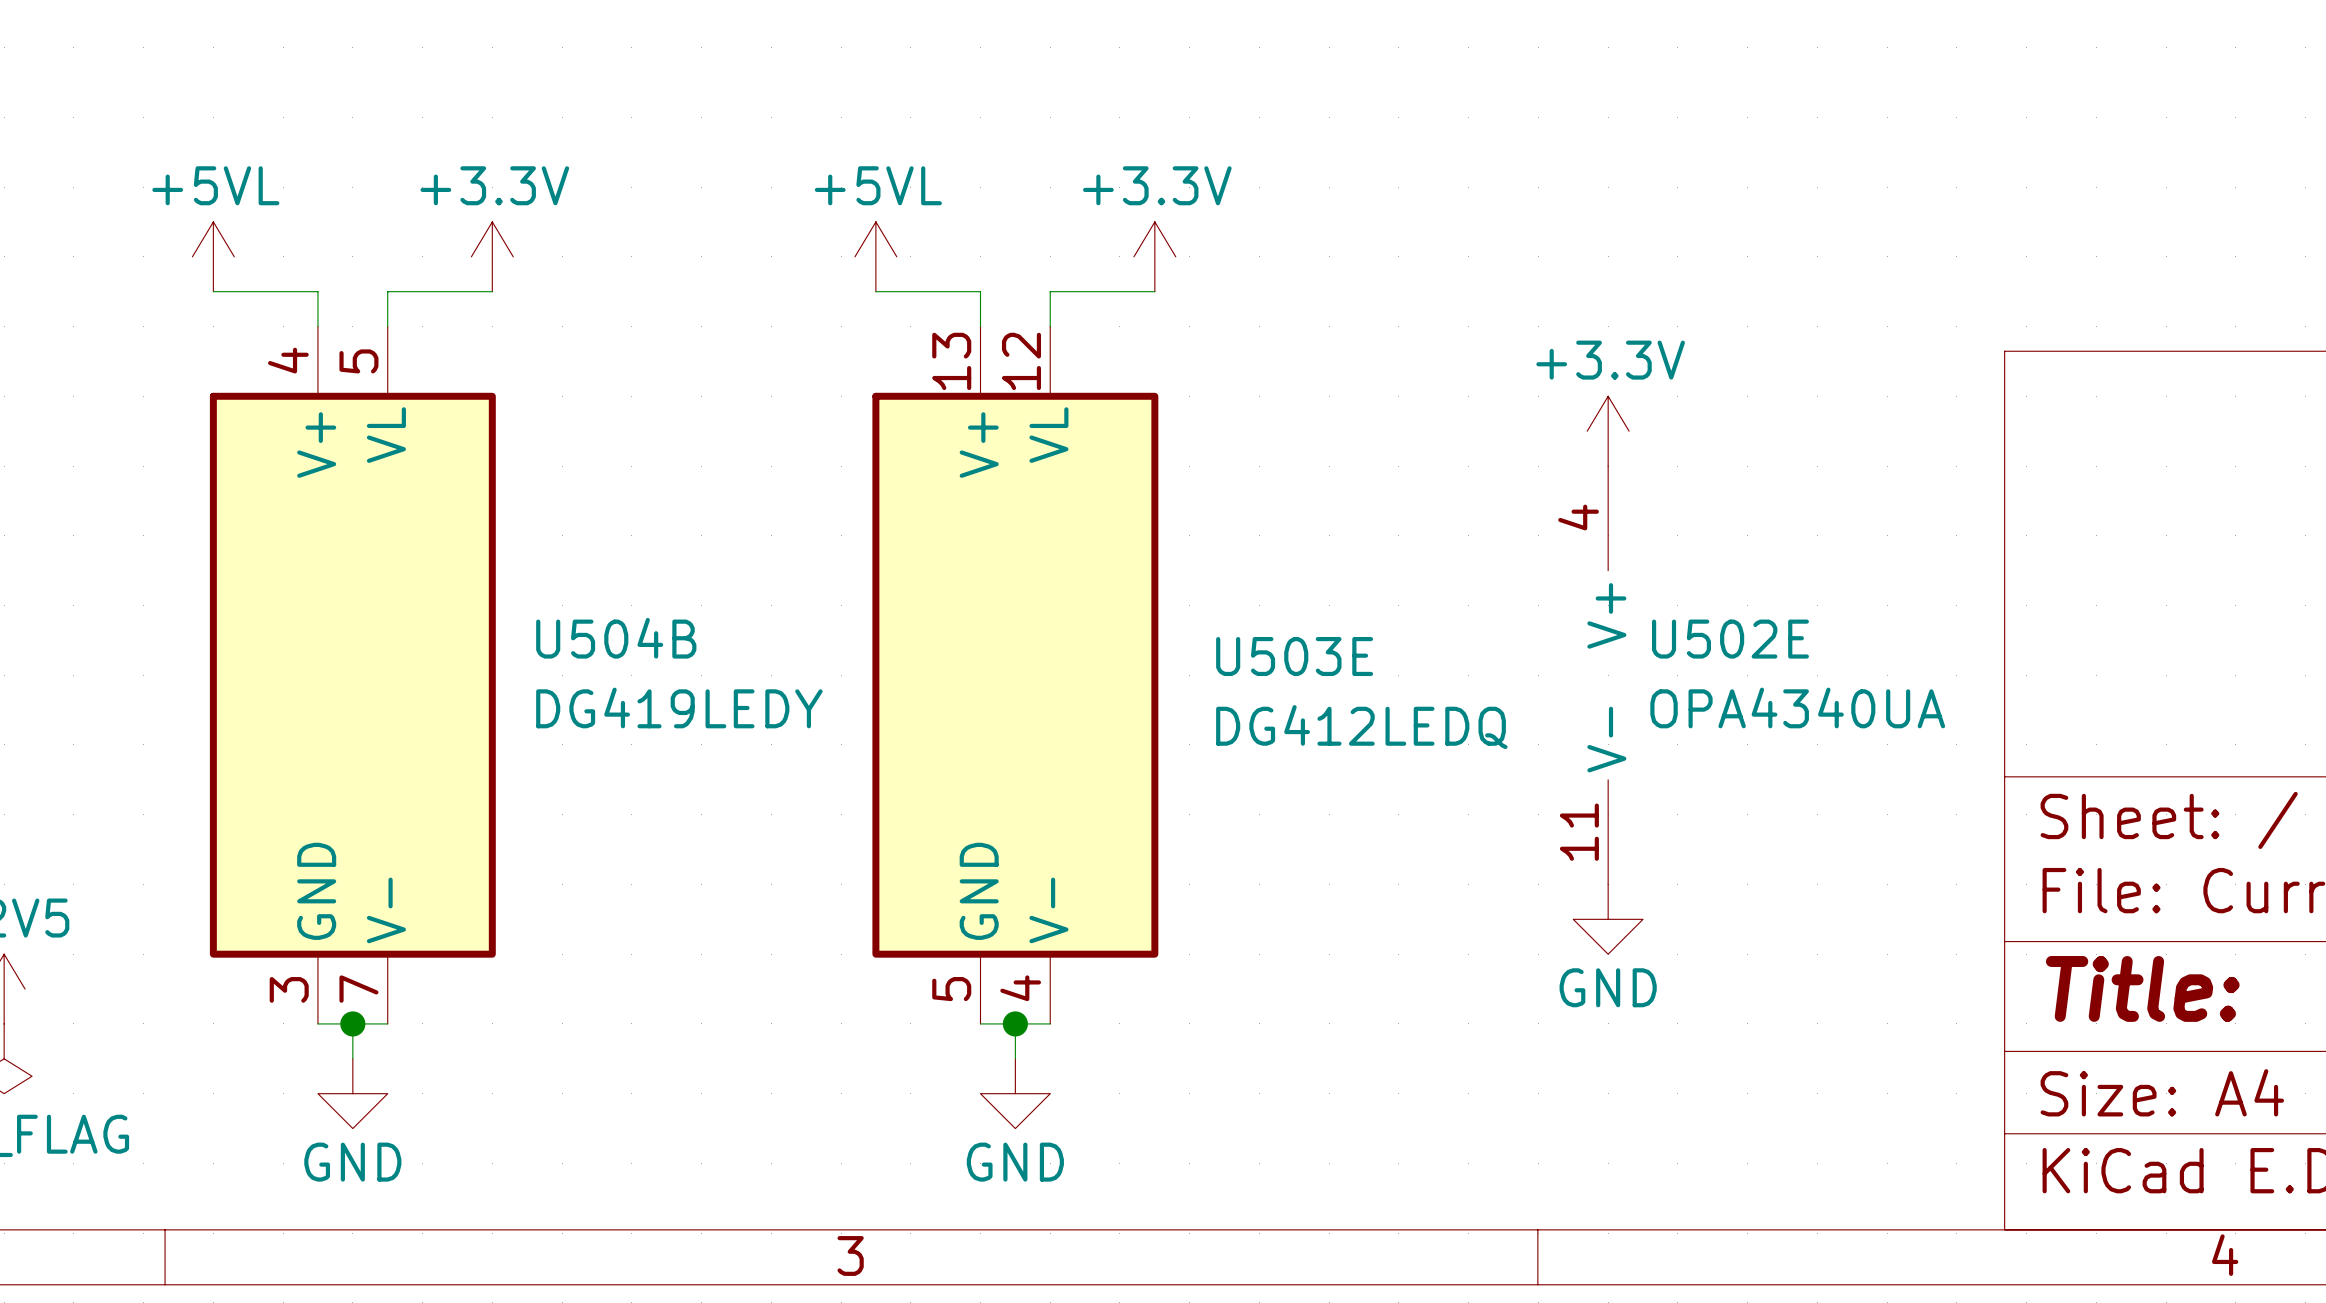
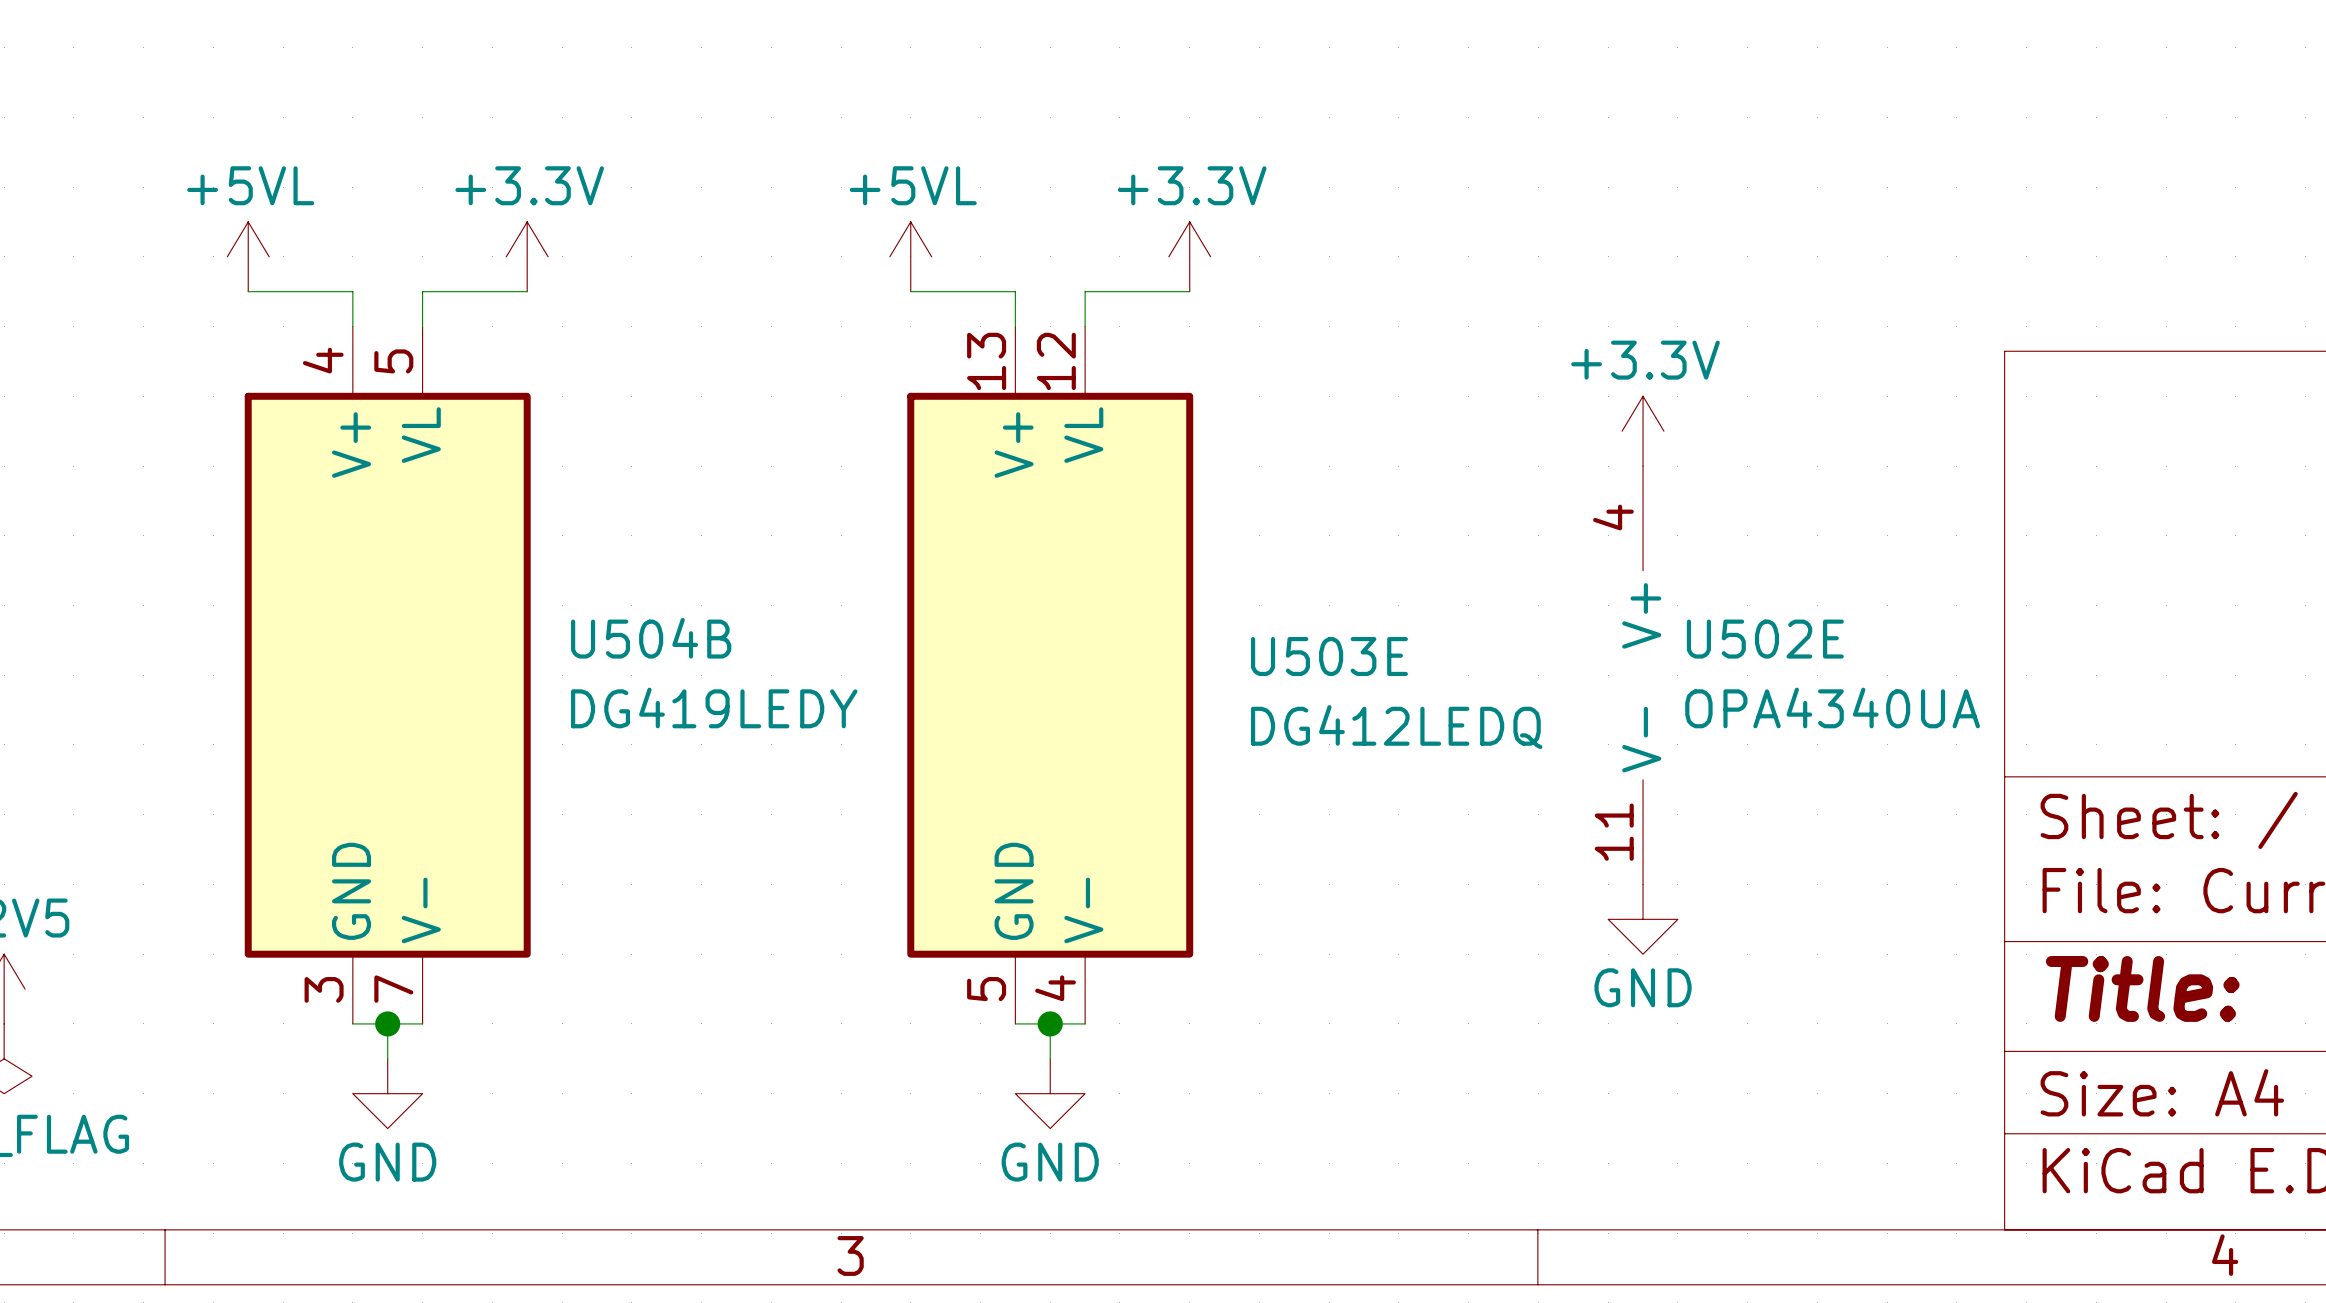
power symbol position: +5VL (213, 256) -> +5VL (248, 256)
power symbol position: +3.3V (492, 256) -> +3.3V (527, 256)
power symbol position: +5VL (875, 256) -> +5VL (910, 256)
power symbol position: +3.3V (1154, 256) -> +3.3V (1189, 256)
wire: (213, 291) (248, 291) -> (492, 291) (527, 291)
wire: (317, 291) (317, 326) -> (317, 291) (352, 291) (352, 326)
wire: (422, 291) (387, 291) (387, 326) -> (422, 291) (422, 326)
wire: (875, 291) (910, 291) -> (1154, 291) (1189, 291)
wire: (980, 291) (980, 326) -> (980, 291) (1015, 291) (1015, 326)
wire: (1085, 291) (1050, 291) (1050, 326) -> (1085, 291) (1085, 326)
power symbol position: +3.3V (1608, 431) -> +3.3V (1643, 431)
U504B position: (352, 675) -> (387, 675)
U503E position: (1015, 675) -> (1050, 675)
U502E position: (1608, 675) -> (1643, 675)
power symbol position: GND (1608, 919) -> GND (1643, 919)
wire: (317, 1023) (352, 1023) (352, 1058) -> none
junction position: (352, 1023) -> (387, 1023)
wire: none -> (422, 1023) (387, 1023) (387, 1058)
wire: (980, 1023) (1015, 1023) (1015, 1058) -> none
junction position: (1015, 1023) -> (1050, 1023)
wire: none -> (1085, 1023) (1050, 1023) (1050, 1058)
power symbol position: GND (352, 1093) -> GND (387, 1093)
power symbol position: GND (1015, 1093) -> GND (1050, 1093)

